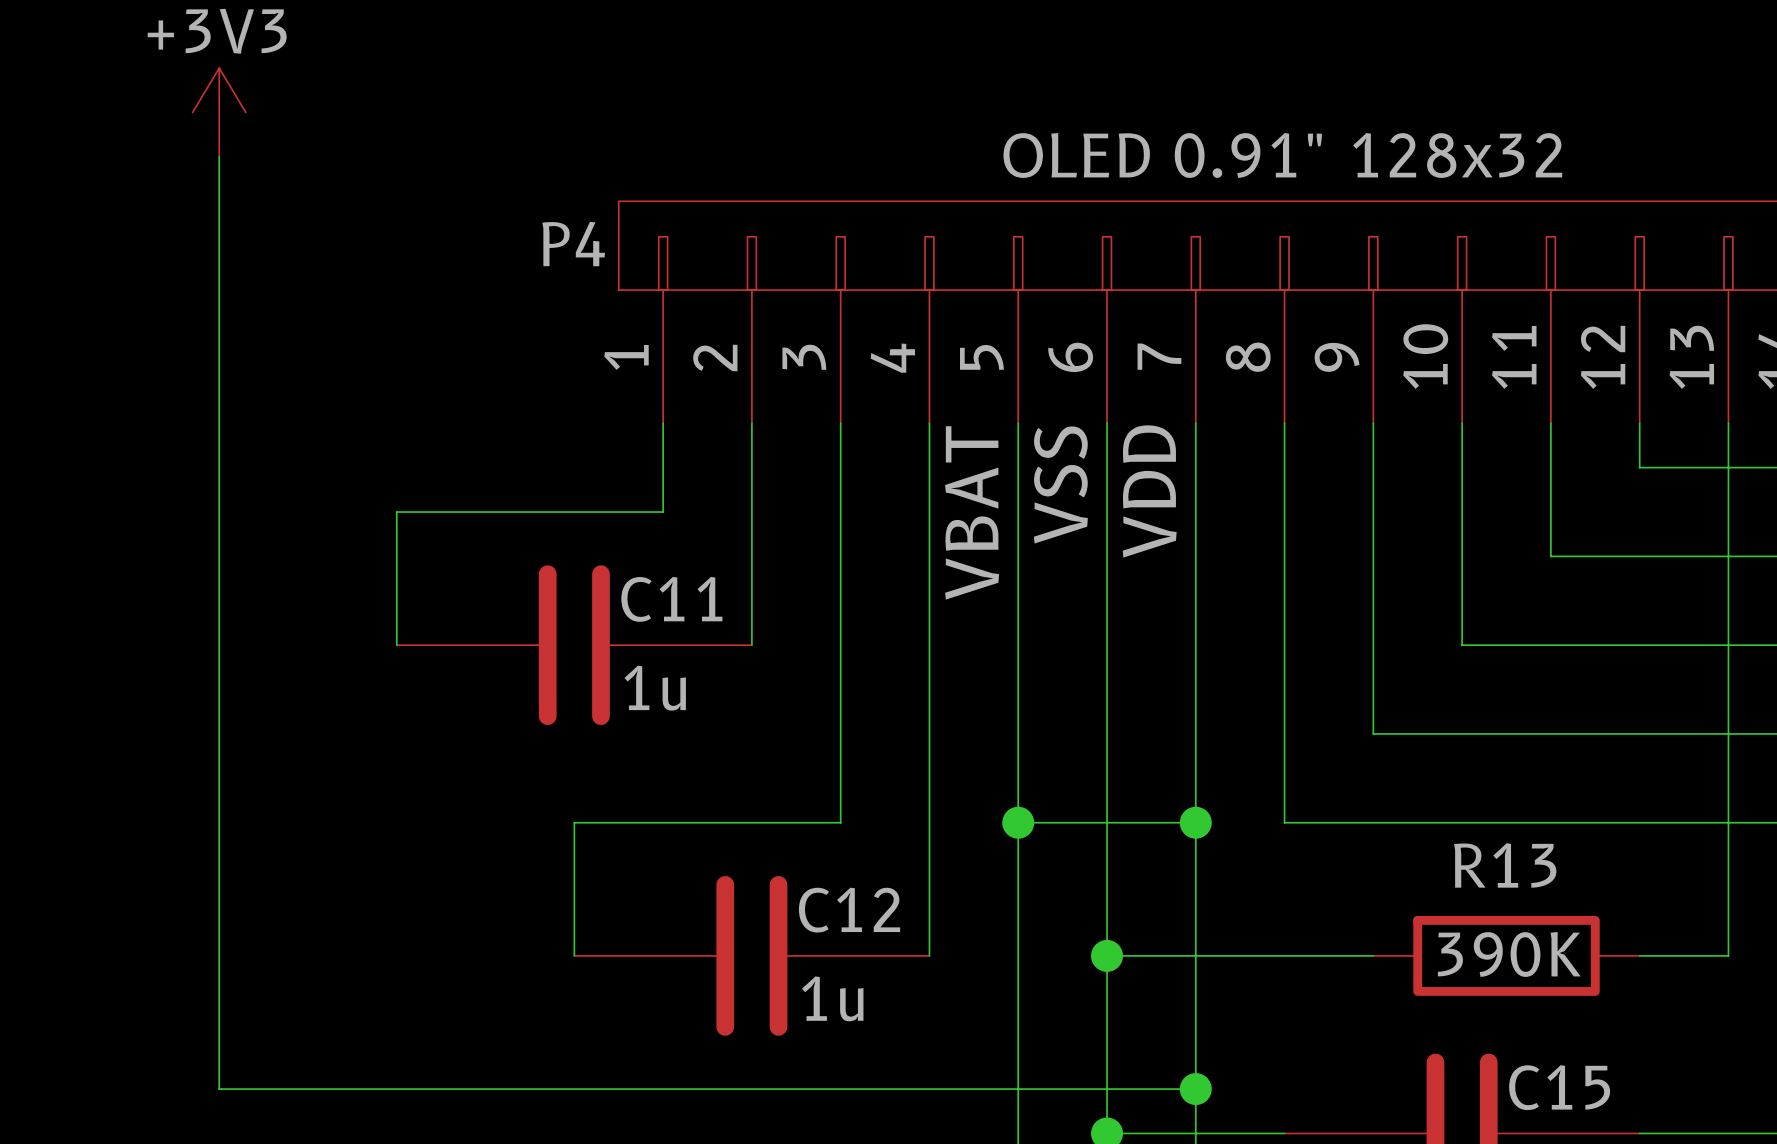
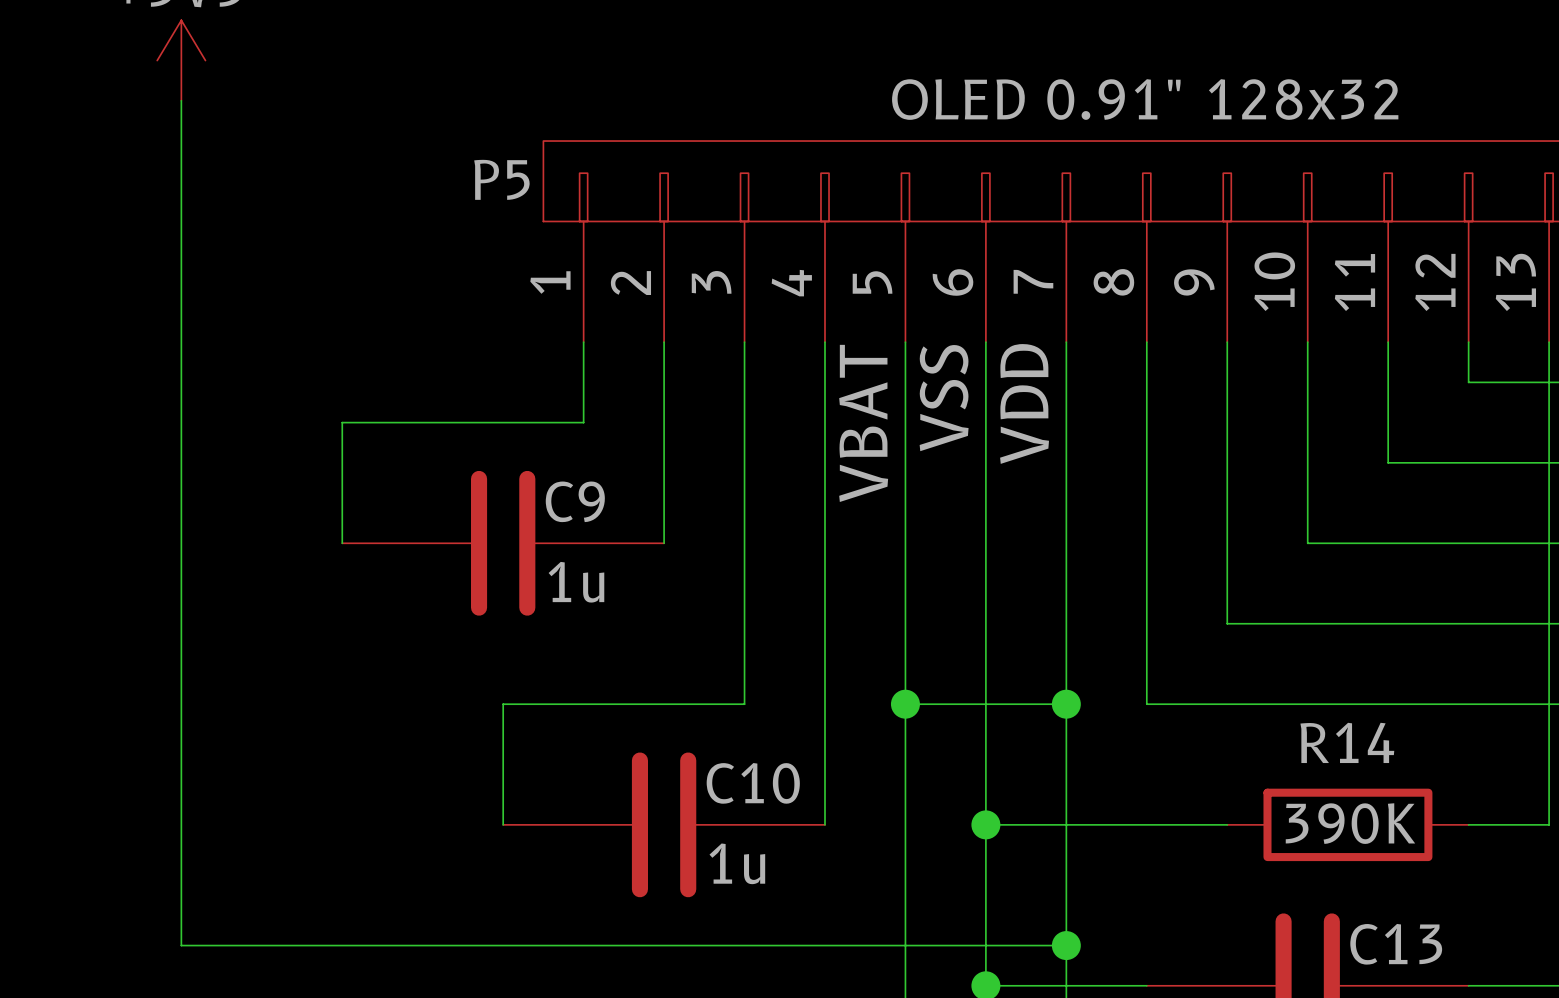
P4 name: P4 (573, 244) -> P5 (501, 179)
C11 name: C11 (671, 599) -> C9 (575, 501)
R13 name: R13 (1505, 865) -> R14 (1347, 742)
C12 name: C12 (849, 910) -> C10 (753, 783)
C15 name: C15 (1559, 1087) -> C13 (1396, 944)

